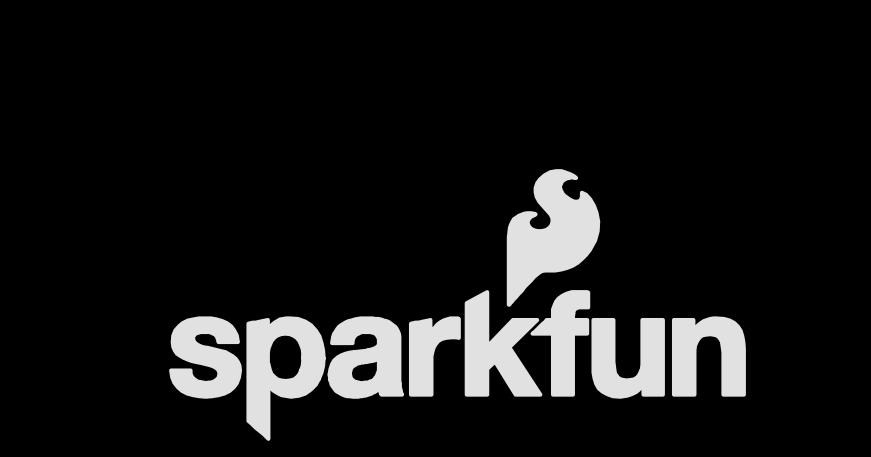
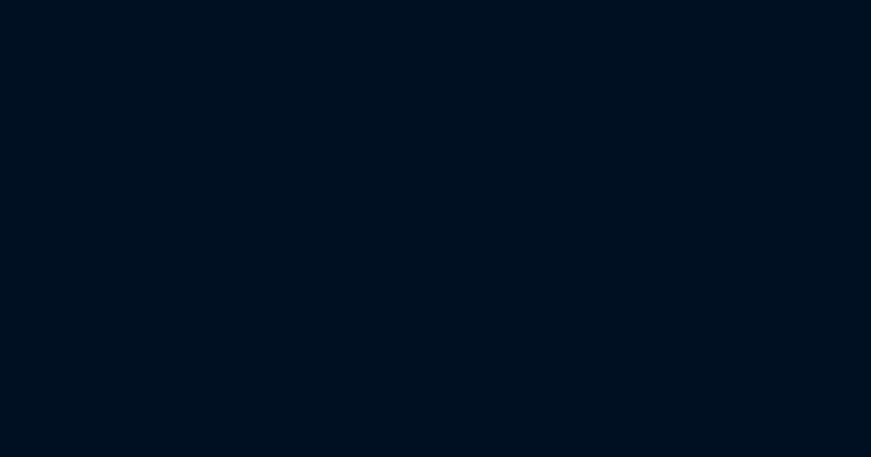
drawing: [169, 169, 746, 441] -> none

